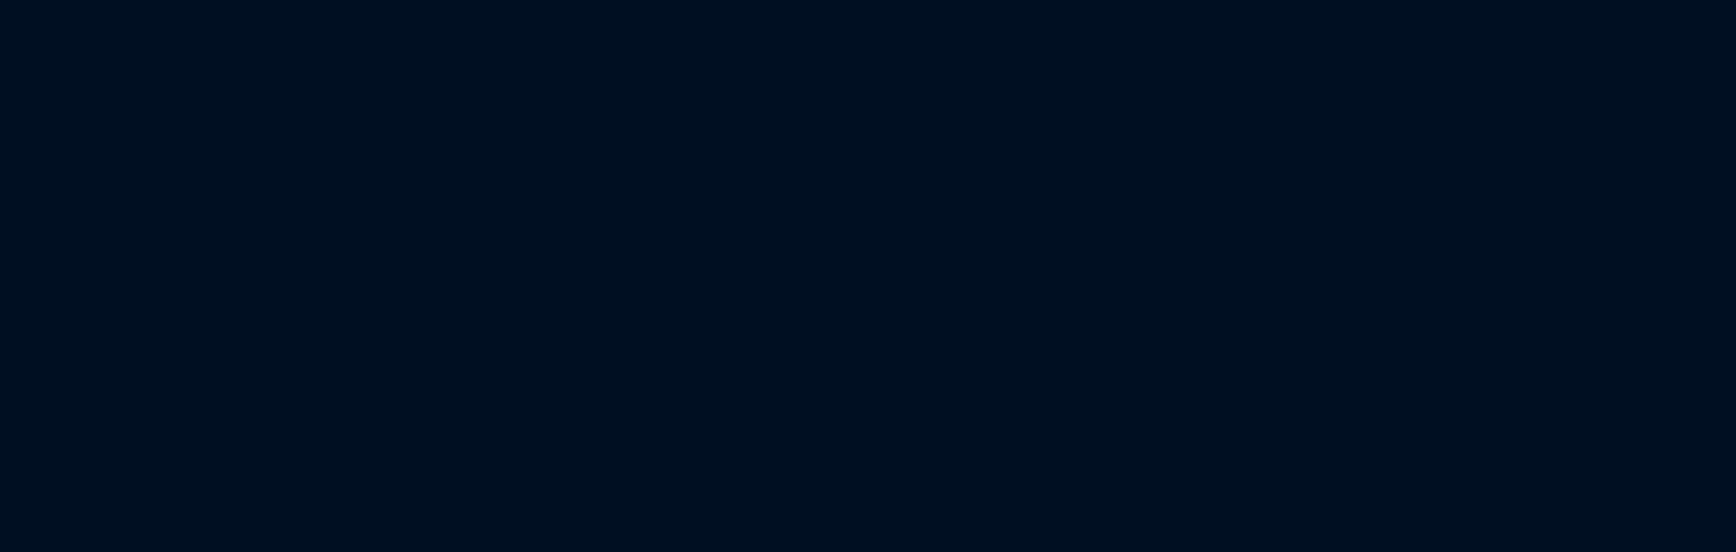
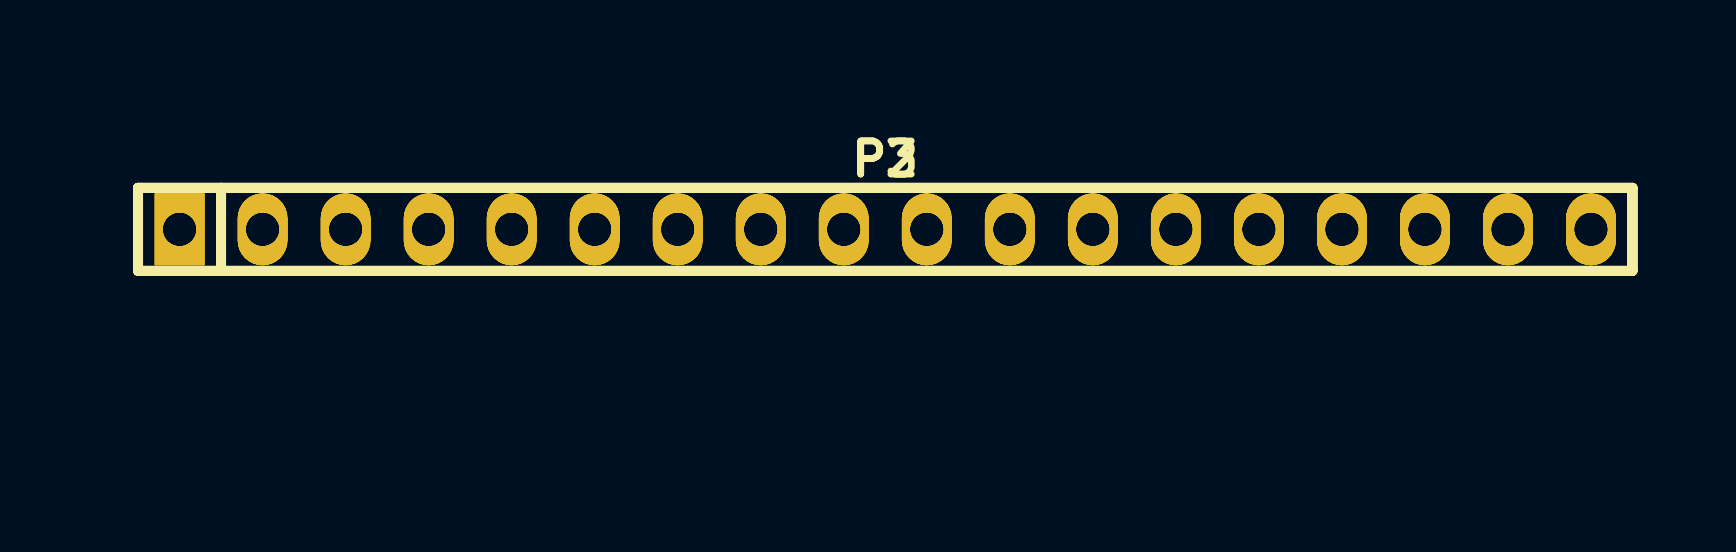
part: none -> (885, 229)
part: none -> (885, 229)

